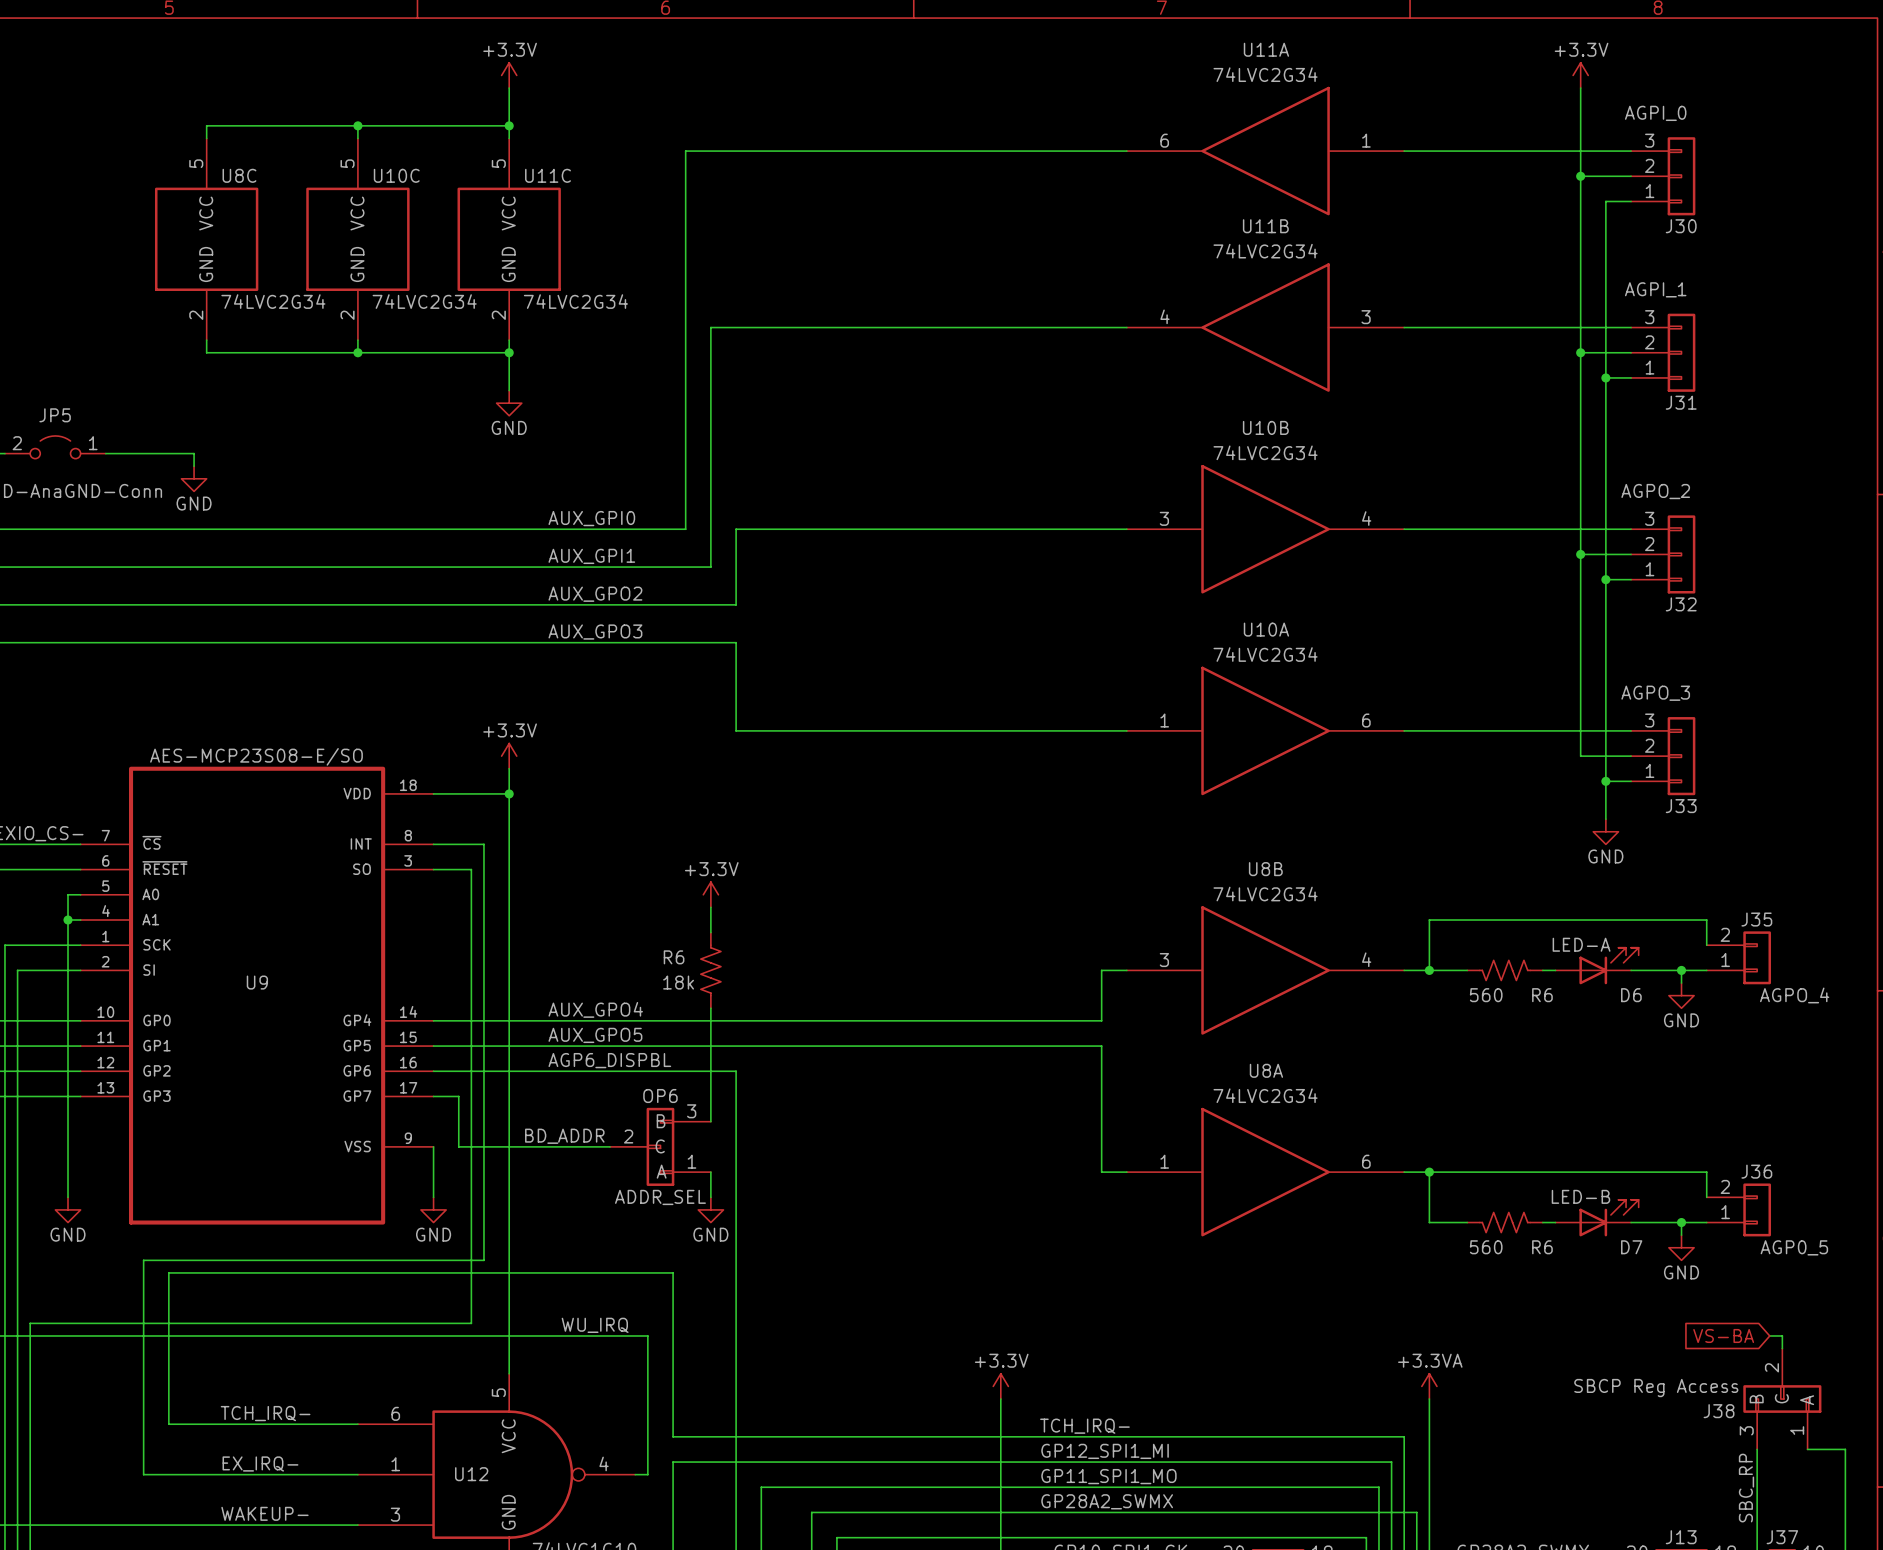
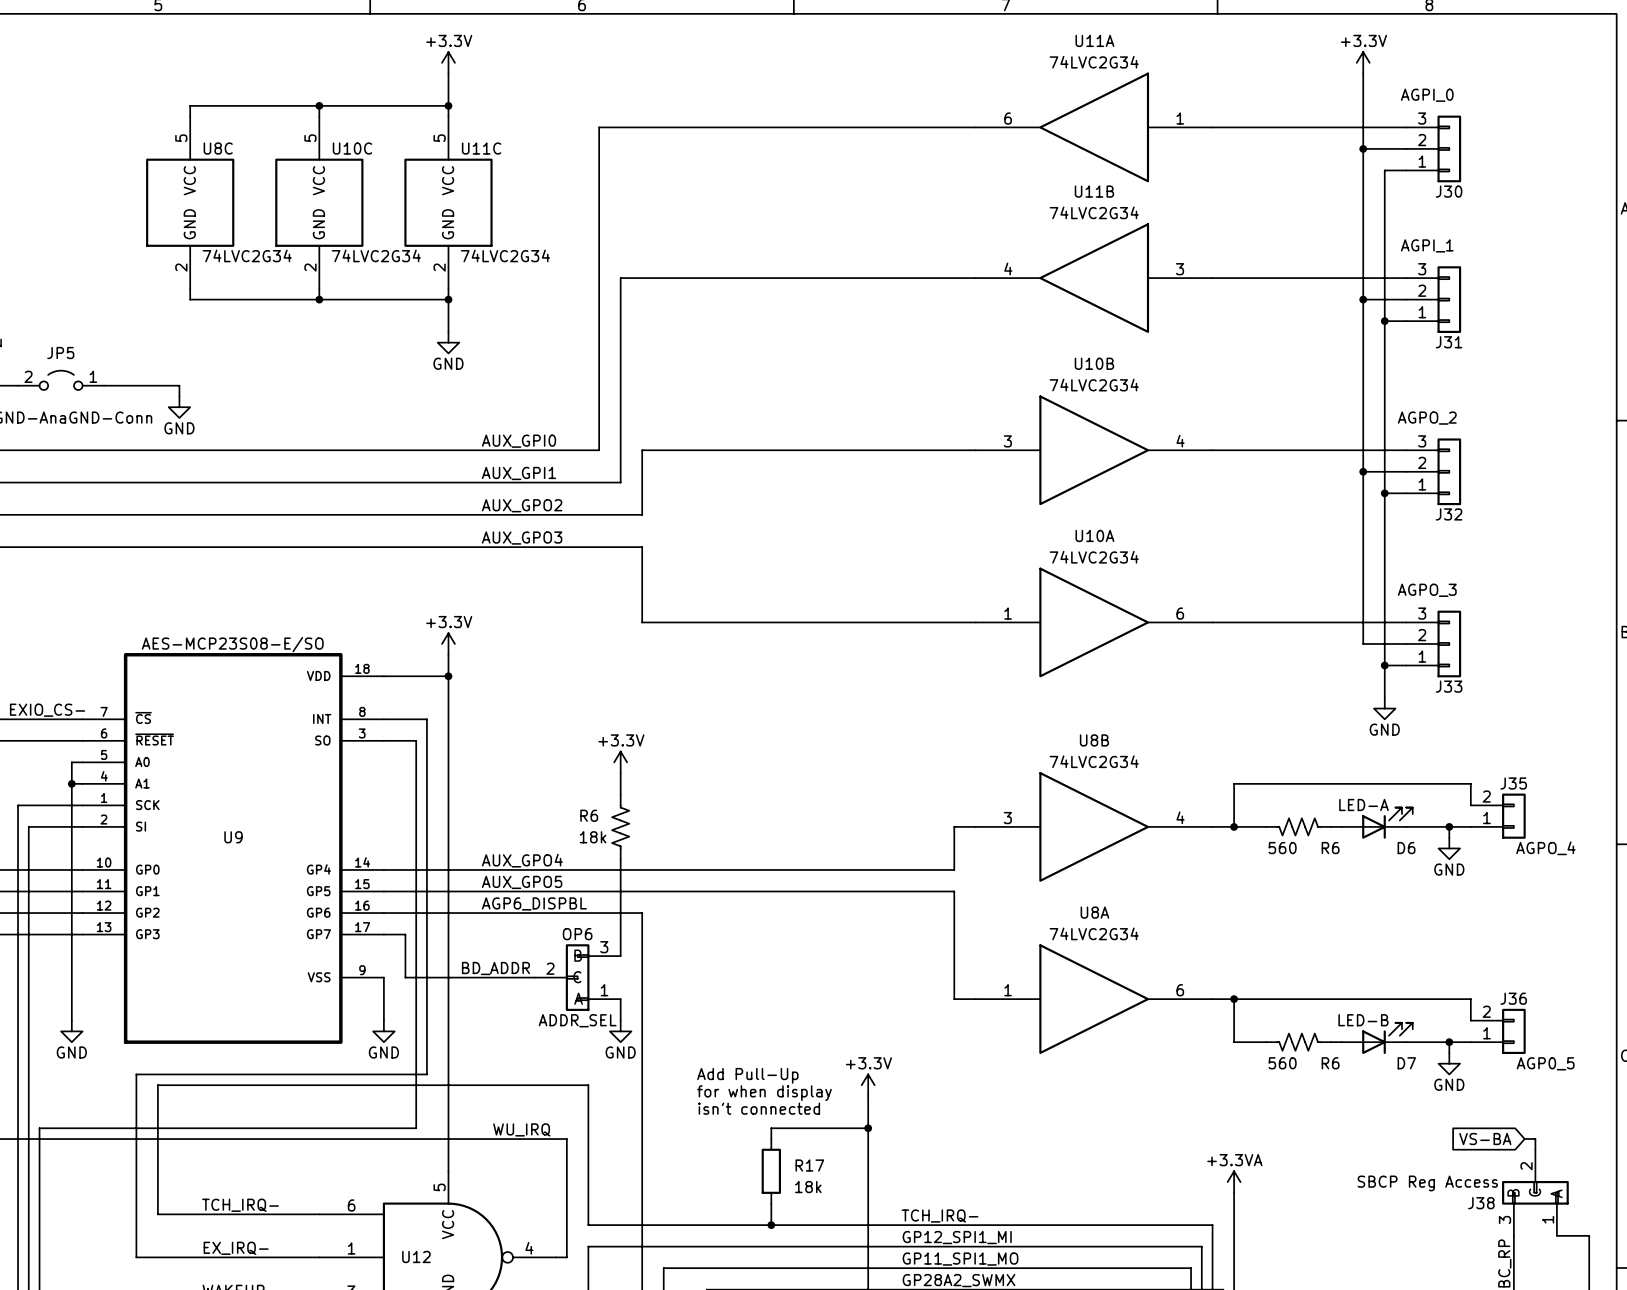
text: none -> Add Pull-Up (747, 1075)
text: none -> for when display (764, 1093)
wire: none -> (868, 1095) (868, 1192)
text: none -> isn't connected (759, 1108)
wire: none -> (868, 1128) (771, 1128) (771, 1139)
junction: none -> (868, 1128)
R17: none -> 18k (771, 1171)
power symbol position: +3.3V (1000, 1386) -> +3.3V (868, 1085)
wire: none -> (771, 1203) (771, 1225)
junction: none -> (771, 1225)

